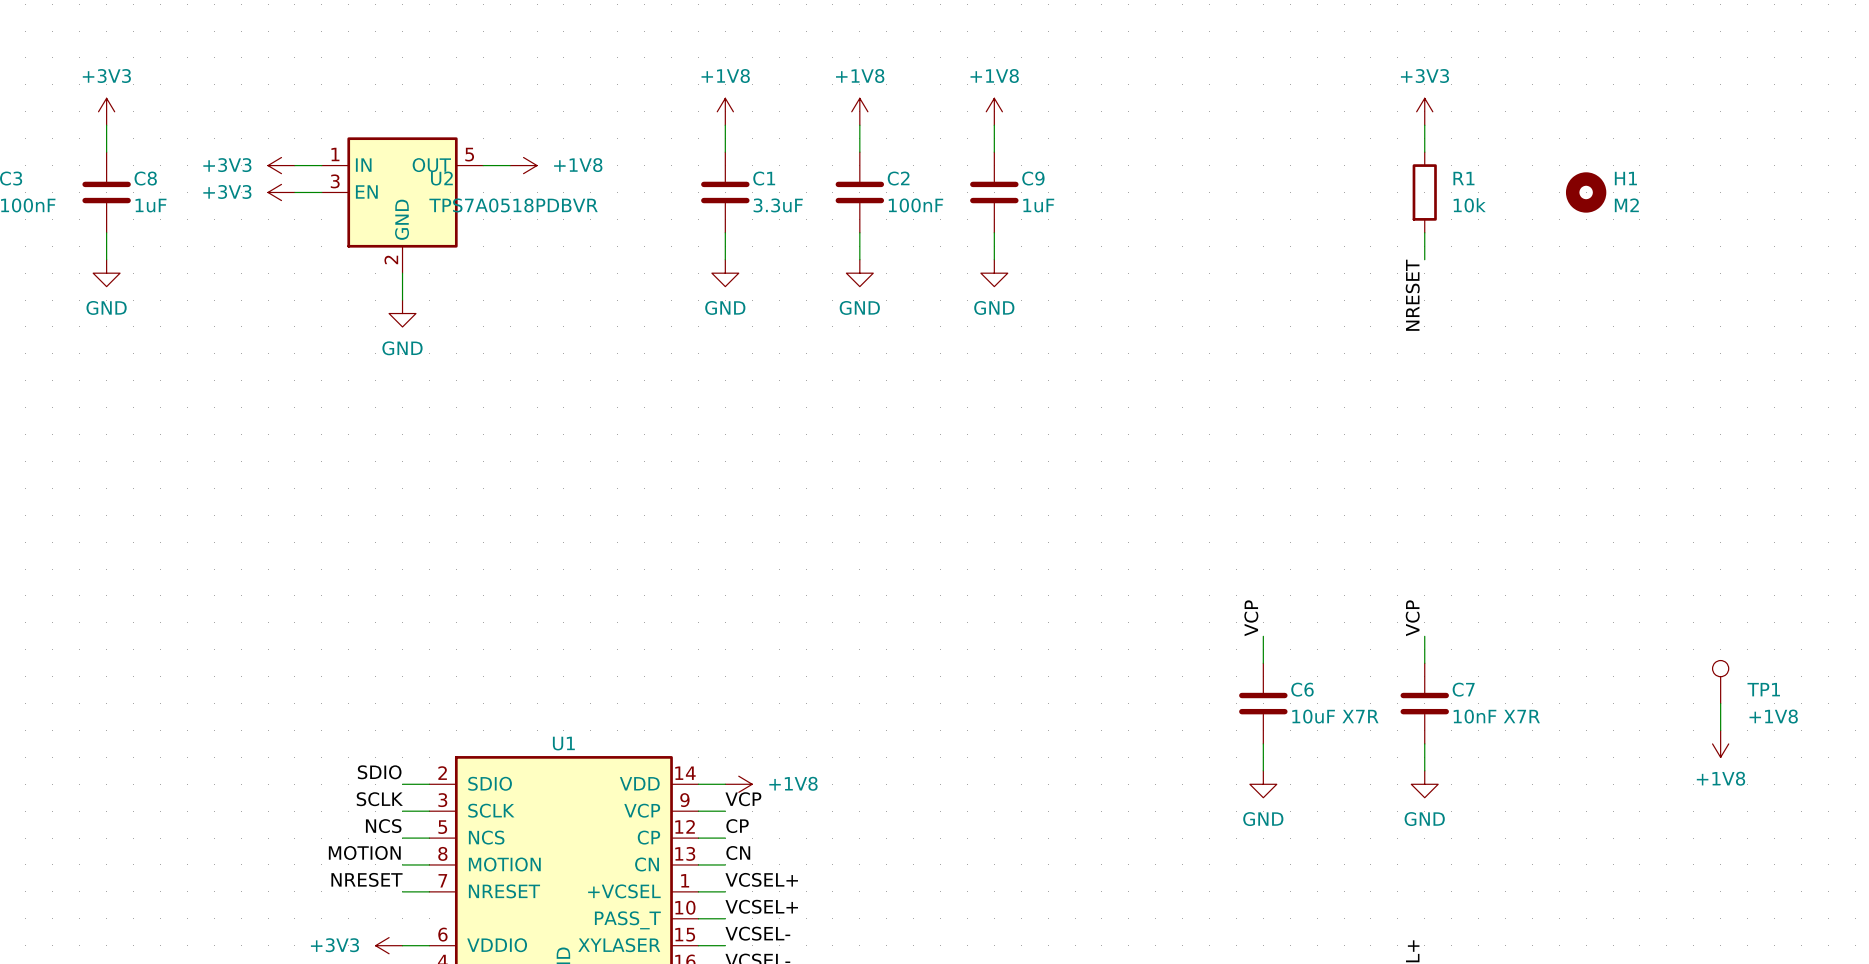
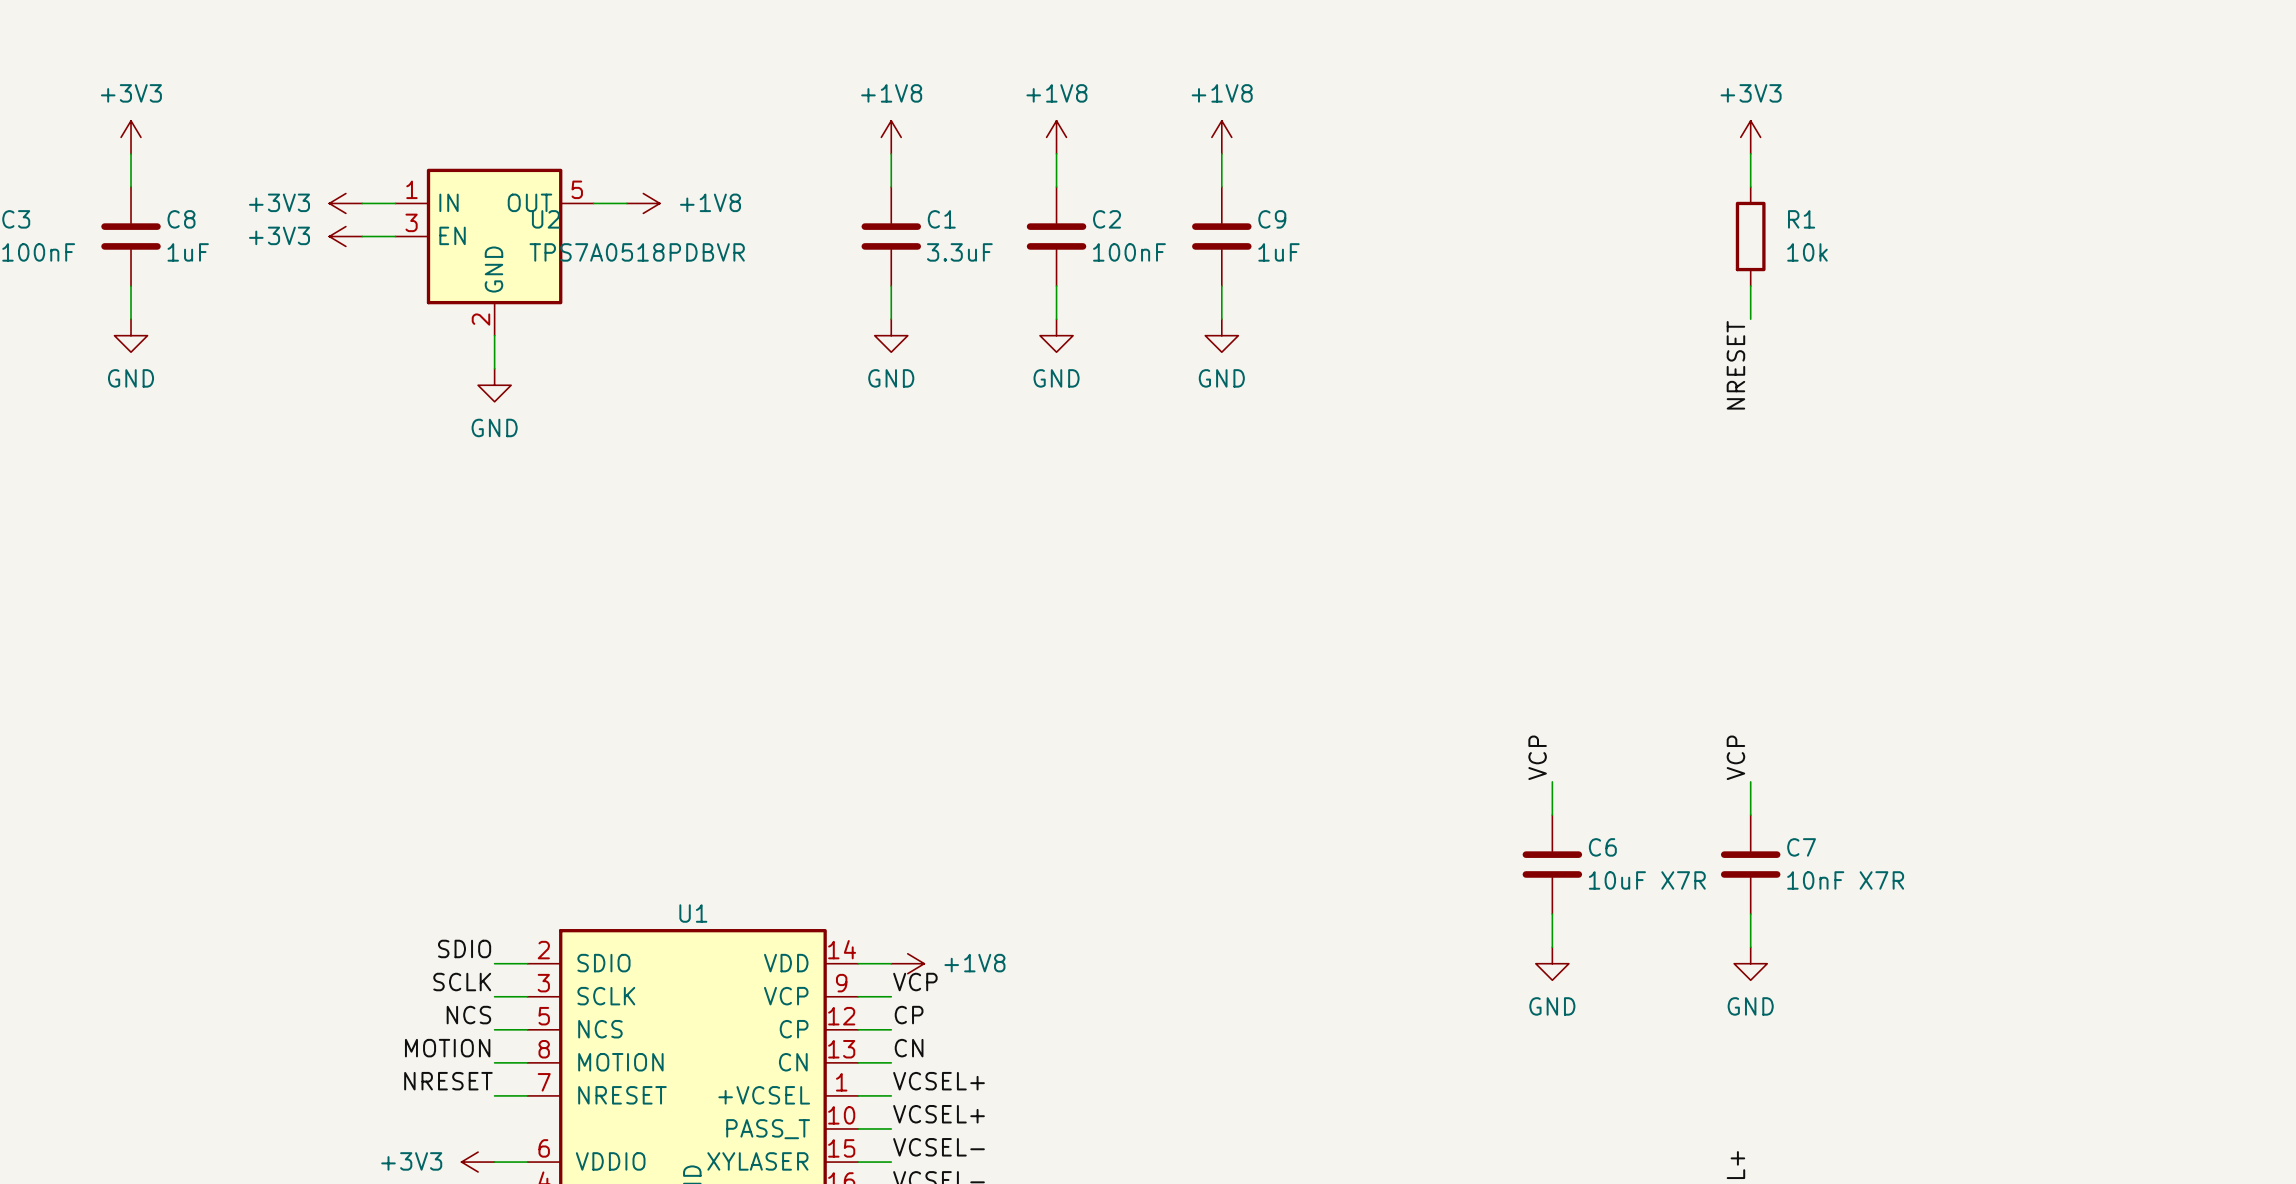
H1: M2 (1586, 192) -> none
TP1: +1V8 (1720, 682) -> none
wire: (1720, 703) (1720, 730) -> none
power symbol: +1V8 (1720, 743) -> none

